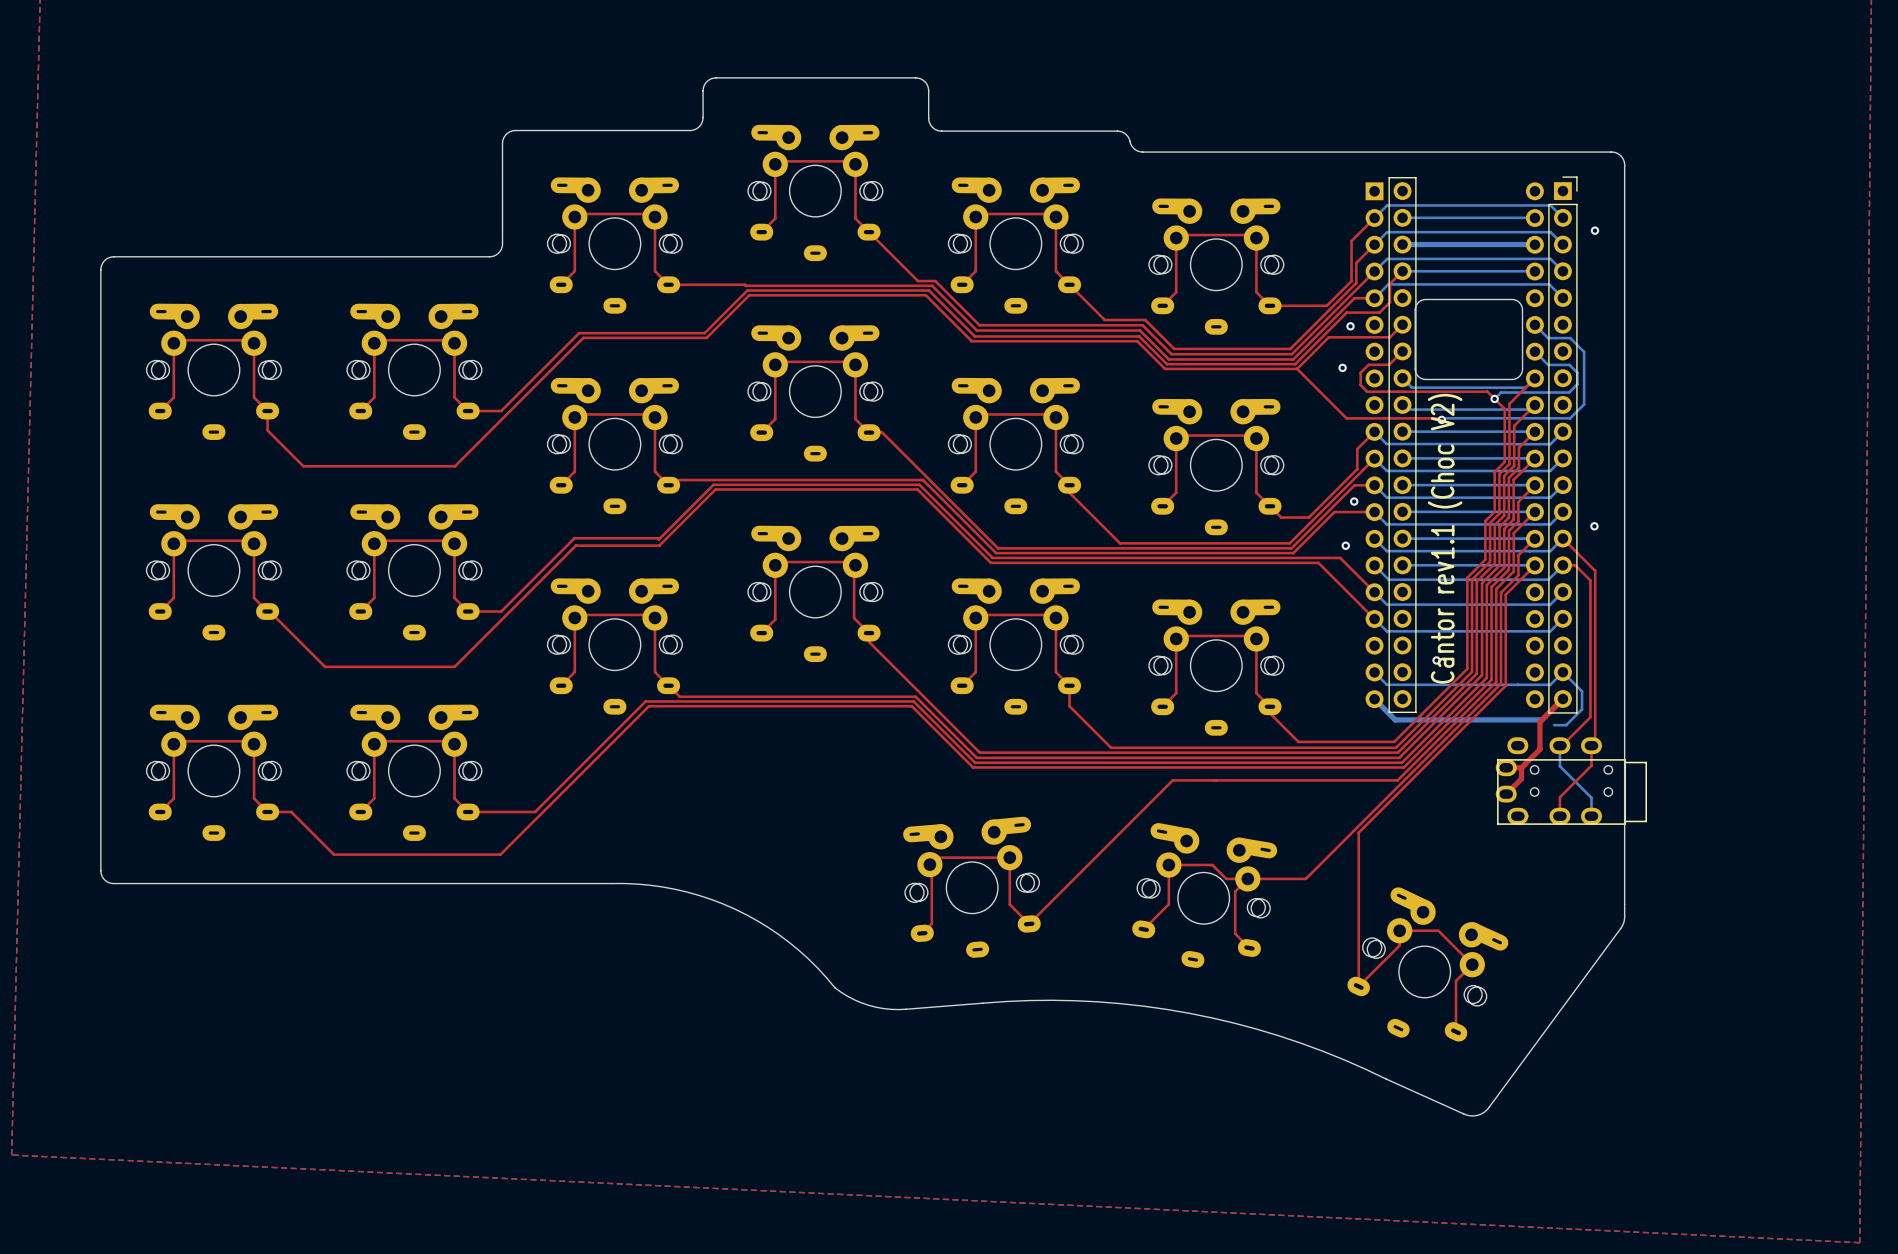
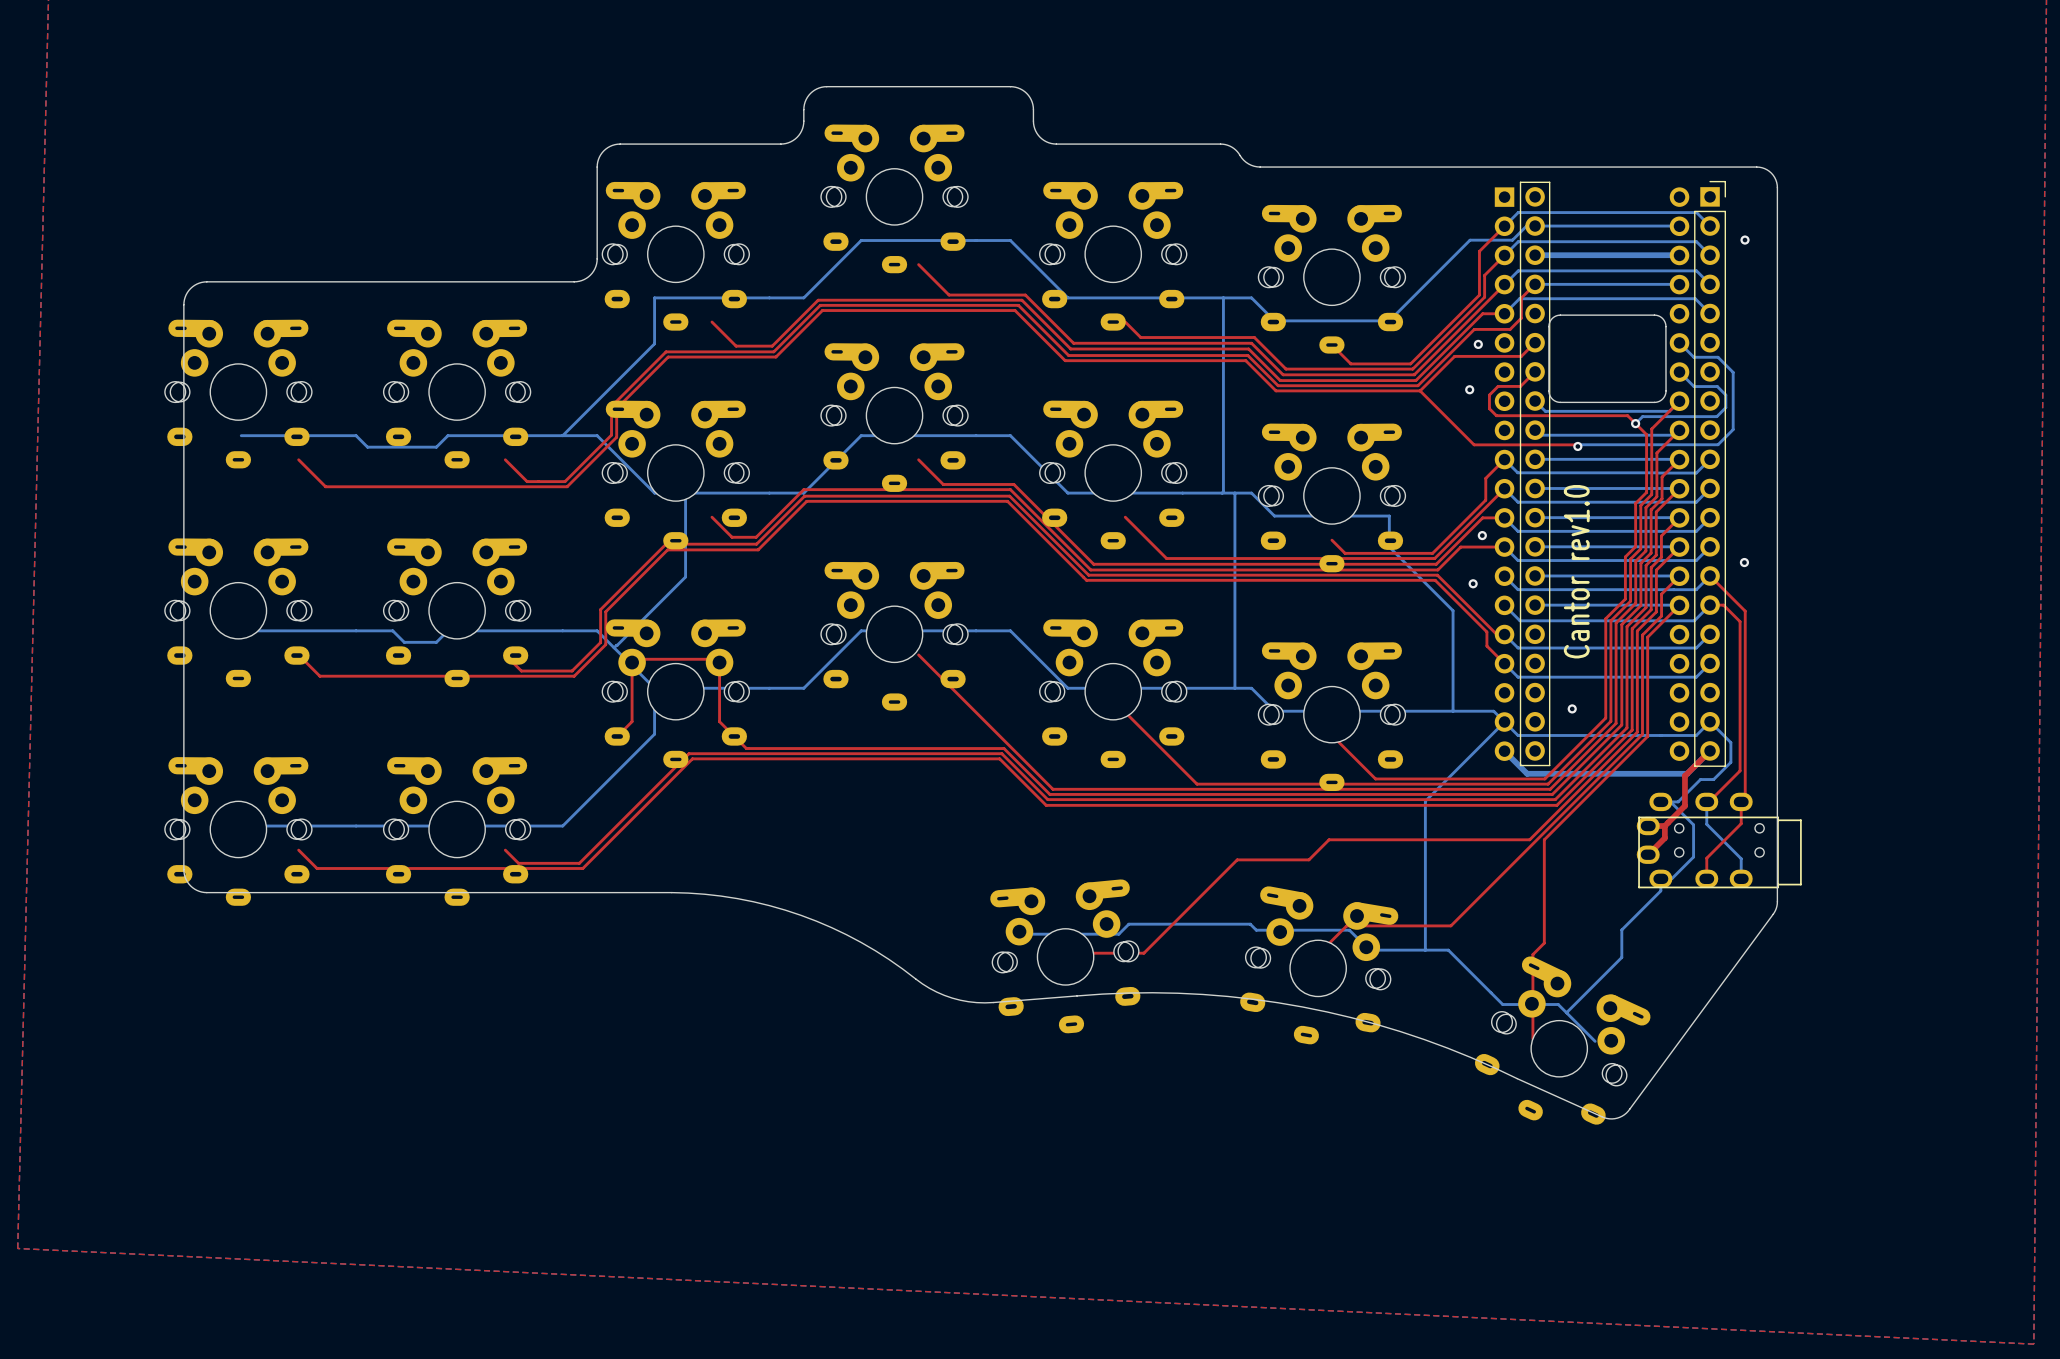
board edge: (1624, 182) (1623, 160) (1619, 154) (1612, 152) (1141, 151) (1133, 148) (1126, 135) (1118, 131) (937, 130) (932, 127) (929, 121) (927, 85) (923, 80) (917, 78) (716, 77) (708, 80) (704, 85) (702, 120) (699, 126) (693, 130) (515, 130) (507, 133) (502, 143) (502, 245) (498, 252) (492, 256) (108, 257) (102, 263) (100, 269) (100, 870) (104, 879) (113, 883) (624, 883) (662, 886) (711, 899) (757, 921) (799, 950) (834, 987) (854, 999) (868, 1005) (898, 1009) (1005, 1001) (1074, 1000) (1143, 1006) (1189, 1013) (1234, 1023) (1301, 1043) (1344, 1059) (1463, 1113) (1473, 1115) (1482, 1113) (1487, 1108) (1621, 926) (1624, 916) (1624, 837) -> (1777, 187) (1775, 179) (1771, 173) (1764, 168) (1756, 167) (1257, 166) (1246, 162) (1231, 147) (1222, 144) (1048, 142) (1042, 139) (1035, 131) (1032, 104) (1029, 97) (1022, 90) (1015, 87) (824, 86) (814, 90) (807, 97) (804, 104) (801, 131) (795, 139) (785, 143) (620, 144) (605, 149) (600, 154) (597, 164) (596, 263) (592, 273) (581, 280) (204, 281) (196, 284) (188, 290) (183, 304) (183, 869) (188, 883) (199, 891) (671, 892) (737, 898) (785, 910) (831, 927) (875, 950) (929, 988) (960, 1000) (984, 1002) (1102, 994) (1177, 993) (1253, 999) (1302, 1007) (1376, 1024) (1424, 1039) (1471, 1057) (1601, 1116) (1612, 1118) (1622, 1116) (1628, 1111) (1773, 914) (1777, 901)
bottom track: none -> (1526, 226) (1512, 240) (1470, 240) (1389, 320) (1274, 320) (1251, 297) (1067, 297) (1010, 240) (861, 240) (803, 297) (654, 297) (654, 343) (562, 435)
top track: (761, 232) (775, 218) (775, 164) (778, 161) (852, 161) (855, 164) (855, 218) (917, 281) -> (918, 264) (949, 295) (1006, 295)
bottom track: none -> (1223, 297) (1222, 493)
top track: (561, 284) (574, 271) (574, 216) (577, 213) (652, 213) (654, 216) (654, 271) (668, 284) (746, 285) -> none
top track: (962, 284) (975, 271) (975, 216) (978, 213) (1052, 213) (1055, 216) (1055, 271) (1104, 320) -> (1125, 322) (1140, 337) (1210, 337)
top track: none -> (818, 300) (772, 346) (736, 346) (711, 322)
top track: (1162, 305) (1176, 292) (1176, 238) (1179, 235) (1253, 235) (1256, 238) (1256, 292) (1270, 305) -> none
top track: (1272, 305) (1326, 305) -> (1331, 344) (1350, 363) (1410, 363) (1452, 322)
top track: (605, 333) (579, 333) (501, 411) (468, 411) (454, 397) (454, 343) (451, 340) (377, 340) (374, 343) (374, 397) (360, 411) -> (666, 351) (611, 406) (611, 435) (565, 481) (527, 481) (505, 459)
top track: (607, 337) (583, 337) (454, 466) (303, 466) (293, 456) -> (668, 357) (616, 408) (616, 437) (567, 486) (325, 486)
bottom track: none -> (241, 435) (356, 435) (367, 447) (436, 447) (447, 435) (597, 435) (654, 493) (803, 493) (861, 435) (1010, 435) (1067, 493) (1251, 493) (1274, 516) (1389, 516) (1389, 547) (1453, 610) (1453, 711)
top track: (160, 411) (173, 397) (173, 343) (176, 340) (251, 340) (254, 343) (254, 397) (267, 411) (269, 432) -> none
top track: (761, 432) (775, 419) (775, 364) (778, 361) (852, 361) (855, 364) (855, 419) (869, 432) (881, 432) (998, 548) (1291, 548) (1312, 527) -> (918, 459) (943, 484) (1013, 484) (1093, 564) (1436, 564)
bottom track: none -> (685, 493) (685, 577) (614, 647)
bottom track: none -> (1234, 493) (1234, 688)
top track: (713, 484) (919, 484) (992, 557) (1340, 557) (1374, 592) -> (783, 517) (804, 496) (1009, 496) (1088, 575) (1437, 575) (1496, 634) (1504, 634)
top track: (561, 485) (574, 471) (574, 417) (577, 414) (652, 414) (654, 417) (654, 471) (668, 485) (673, 480) (923, 480) (996, 553) (1293, 553) (1313, 533) -> (711, 517) (732, 537) (756, 537) (803, 489) (1010, 489) (1090, 570) (1437, 570)
top track: (962, 485) (975, 471) (975, 417) (978, 414) (1052, 414) (1055, 417) (1055, 471) (1069, 485) (1069, 492) (1120, 543) (1289, 543) (1310, 522) -> (1125, 517) (1166, 558) (1434, 558)
top track: (715, 489) (917, 489) (990, 562) (1318, 562) (1358, 602) -> (785, 522) (806, 501) (1007, 501) (1086, 580) (1435, 580) (1486, 632) (1486, 646)
top track: none -> (1331, 540) (1345, 553) (1432, 553)
top track: (1162, 506) (1176, 492) (1176, 438) (1179, 435) (1253, 435) (1256, 438) (1256, 492) (1281, 517) (1308, 517) -> none
top track: (688, 509) (659, 539) -> (756, 544) (666, 544) (600, 609) (600, 642) (572, 671) (521, 671) (505, 654)
top track: (690, 514) (658, 546) -> none
text: Cantor rev1.1 (Choc V2) (1445, 538) -> Cantor rev1.0 (1576, 571)
top track: (658, 539) (574, 538) (501, 611) (468, 611) (454, 597) (454, 543) (451, 540) (377, 540) (374, 543) (374, 597) (360, 611) -> none
top track: (659, 545) (575, 545) (454, 666) (325, 666) (288, 630) -> (758, 549) (667, 549) (605, 611) (605, 644) (574, 676) (319, 676)
top track: (854, 565) (854, 618) (869, 633) (869, 641) (979, 752) (1397, 752) (1416, 734) -> (918, 654) (1052, 789) (1550, 789)
top track: (854, 565) (852, 562) (776, 562) (775, 563) (775, 619) (761, 633) -> none
bottom track: none -> (241, 630) (392, 630) (404, 642) (436, 642) (447, 630) (597, 630) (654, 688)
top track: (160, 611) (173, 597) (173, 543) (176, 540) (251, 540) (254, 543) (254, 597) (267, 611) -> none
bottom track: none -> (654, 688) (803, 688) (861, 630) (1010, 630) (1067, 688) (1251, 688) (1274, 711) (1493, 711) (1504, 722) (1425, 801) (1425, 950)
bottom track: none -> (654, 688) (654, 734) (562, 826) (241, 826)
top track: (962, 685) (975, 672) (975, 617) (978, 614) (1052, 614) (1055, 617) (1055, 672) (1069, 685) (1069, 706) -> (1125, 712) (1171, 758)
top track: (645, 701) (535, 811) (468, 811) (454, 798) (454, 744) (451, 741) (377, 741) (374, 744) (374, 798) (360, 811) -> (709, 753) (689, 753) (579, 863) (518, 863) (505, 850)
top track: (648, 706) (500, 854) (333, 854) (291, 811) (267, 811) (254, 798) (254, 744) (251, 741) (176, 741) (173, 744) (173, 798) (160, 811) -> (712, 758) (692, 758) (582, 868) (317, 868) (298, 850)
top track: (1162, 706) (1176, 693) (1176, 638) (1179, 635) (1253, 635) (1256, 638) (1256, 693) (1270, 706) (1270, 713) (1298, 741) (1394, 741) (1411, 724) -> (1331, 735) (1375, 778) (1544, 778)
bottom track: none -> (1700, 779) (1678, 801) (1660, 801)
top track: (1092, 729) (1111, 747) (1396, 747) (1414, 729) -> (1197, 784) (1548, 784)
top track: (957, 738) (976, 757) (1399, 757) (1418, 738) -> (1049, 794) (1552, 794)
top track: (955, 743) (975, 762) (1401, 762) (1421, 743) -> (1047, 799) (1555, 799)
bottom track: none -> (1670, 801) (1693, 824) (1693, 857) (1671, 878)
top track: (954, 748) (973, 767) (1403, 767) (1422, 748) -> (1046, 805) (1556, 805)
top track: (1213, 780) (1172, 780) (1029, 923) (1009, 904) (1009, 857) (936, 857) (929, 864) (931, 866) (931, 923) (922, 933) -> (1329, 839) (1308, 859) (1237, 859) (1143, 953) (1073, 953)
top track: (1411, 780) (1358, 832) (1358, 986) (1399, 945) (1399, 930) (1438, 930) (1472, 964) (1456, 981) (1456, 1031) -> (1544, 839) (1544, 943) (1532, 954) (1532, 1038)
bottom track: none -> (1660, 878) (1660, 890) (1621, 929) (1621, 957) (1566, 1012)
top track: (1325, 859) (1305, 878) (1226, 878) (1212, 865) (1168, 865) (1168, 904) (1143, 929) -> (1450, 925) (1346, 925) (1308, 963)
bottom track: none -> (1014, 934) (1118, 934) (1128, 924) (1250, 924) (1256, 930) (1349, 930) (1369, 950) (1448, 950) (1502, 1004) (1558, 1004) (1595, 1041)
top track: (1247, 878) (1235, 891) (1235, 933) (1249, 948) -> none

